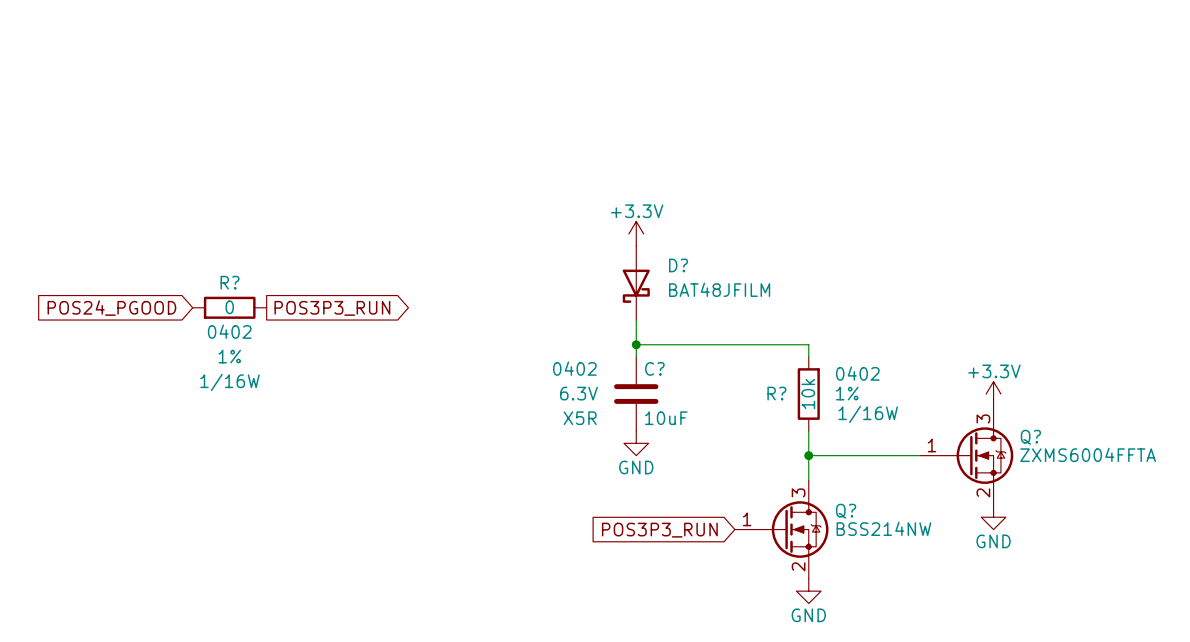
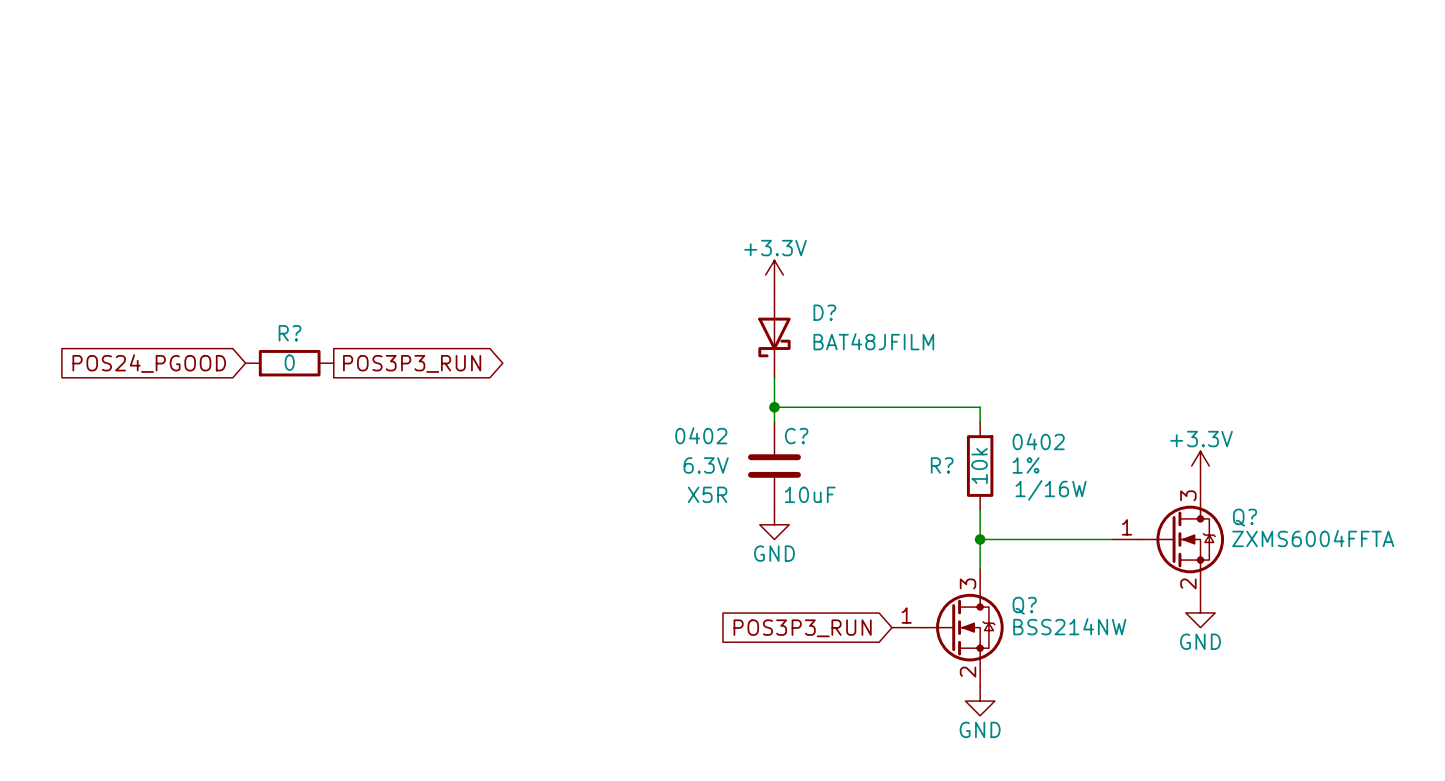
R? text: 0402 (229, 331) -> none
R? text: 1% (229, 356) -> none
R? text: 1/16W (230, 382) -> none

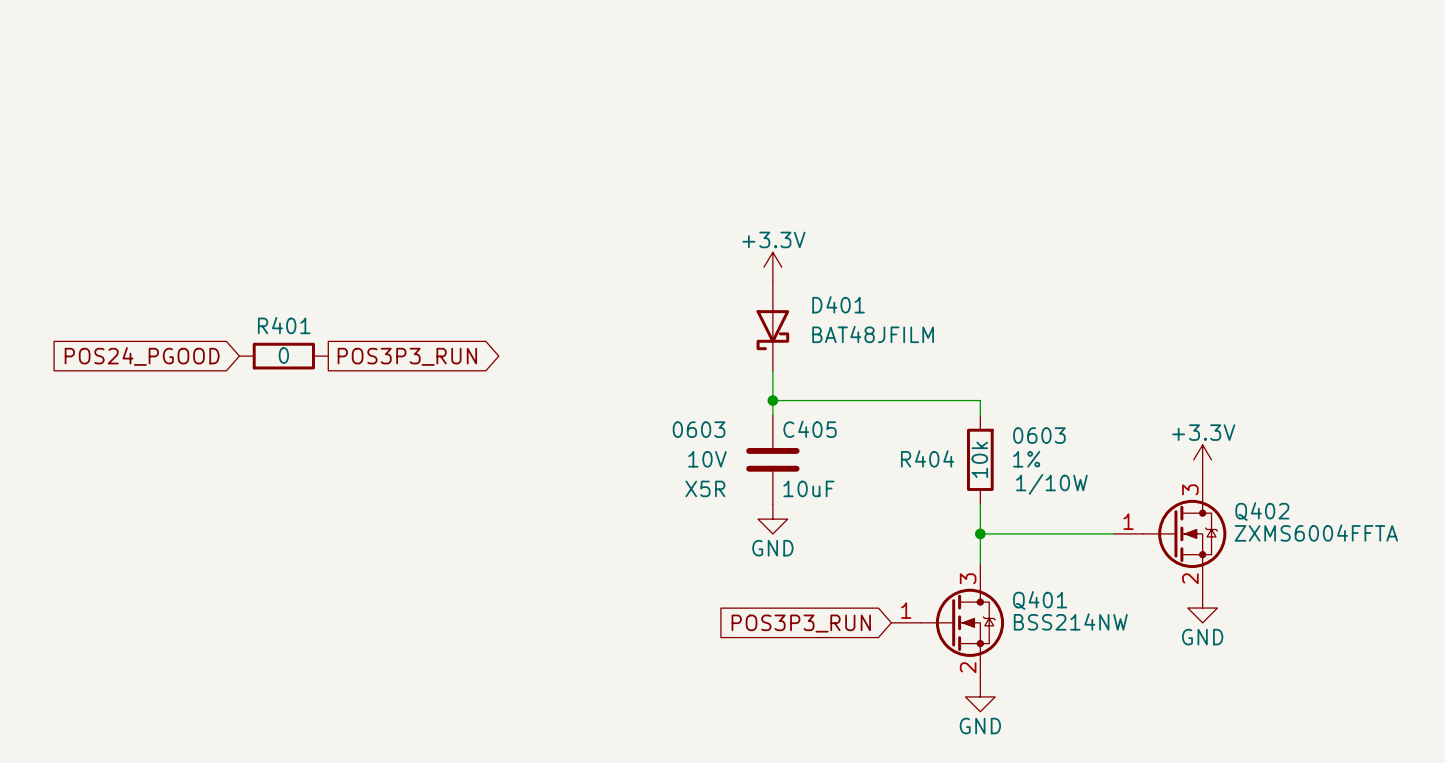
D? name: D? (824, 312) -> D401 (838, 304)
R? name: R? (290, 333) -> R401 (284, 325)
C? text: 0402 (701, 435) -> 0603 (699, 429)
C? name: C? (796, 436) -> C405 (810, 429)
R? text: 0402 (1038, 441) -> 0603 (1039, 435)
C? text: 6.3V (706, 465) -> 10V (707, 459)
R? name: R? (942, 465) -> R404 (927, 458)
R? text: 1/16W (1051, 490) -> 1/10W (1051, 484)
Q? name: Q? (1245, 517) -> Q402 (1262, 511)
Q? name: Q? (1024, 605) -> Q401 (1040, 600)

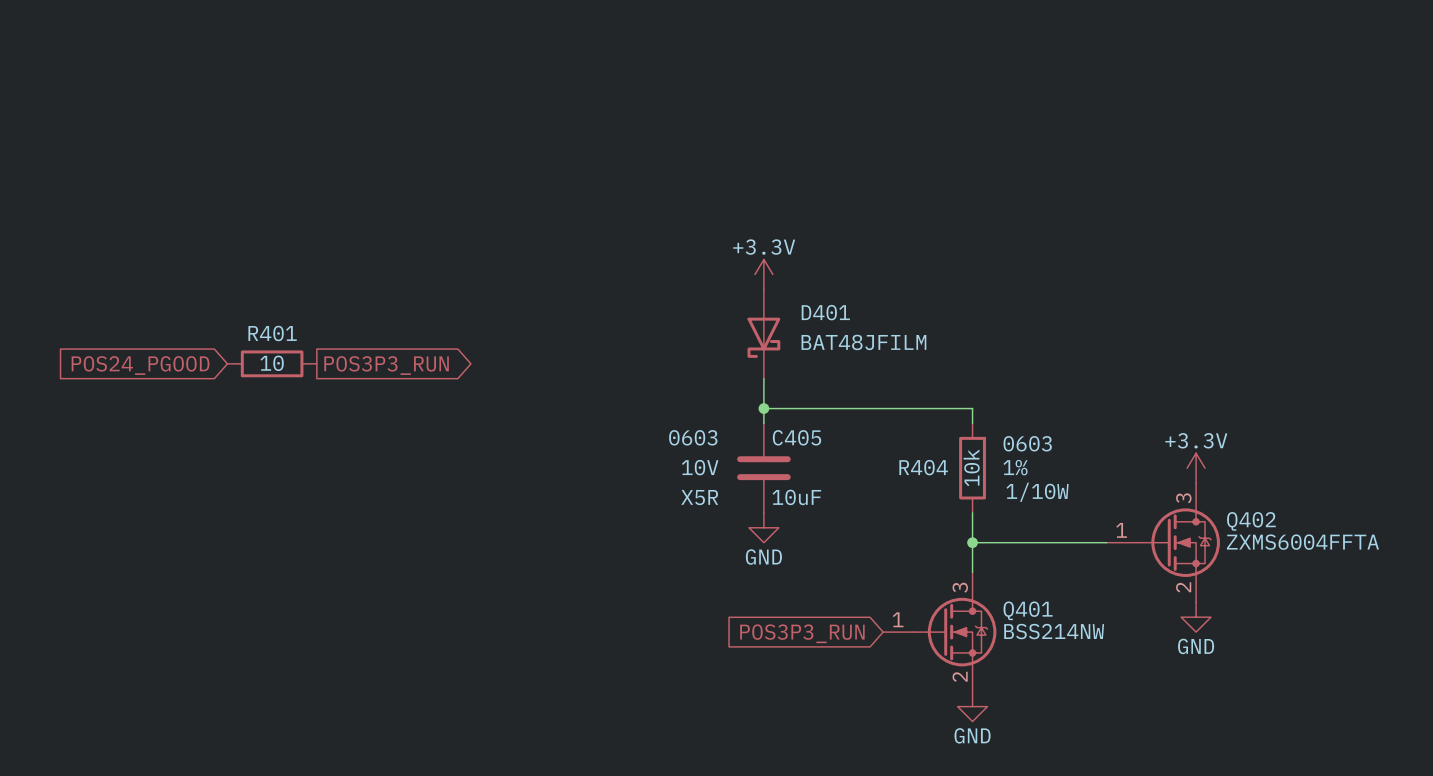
R401 value: 0 (283, 355) -> 10 (272, 363)

